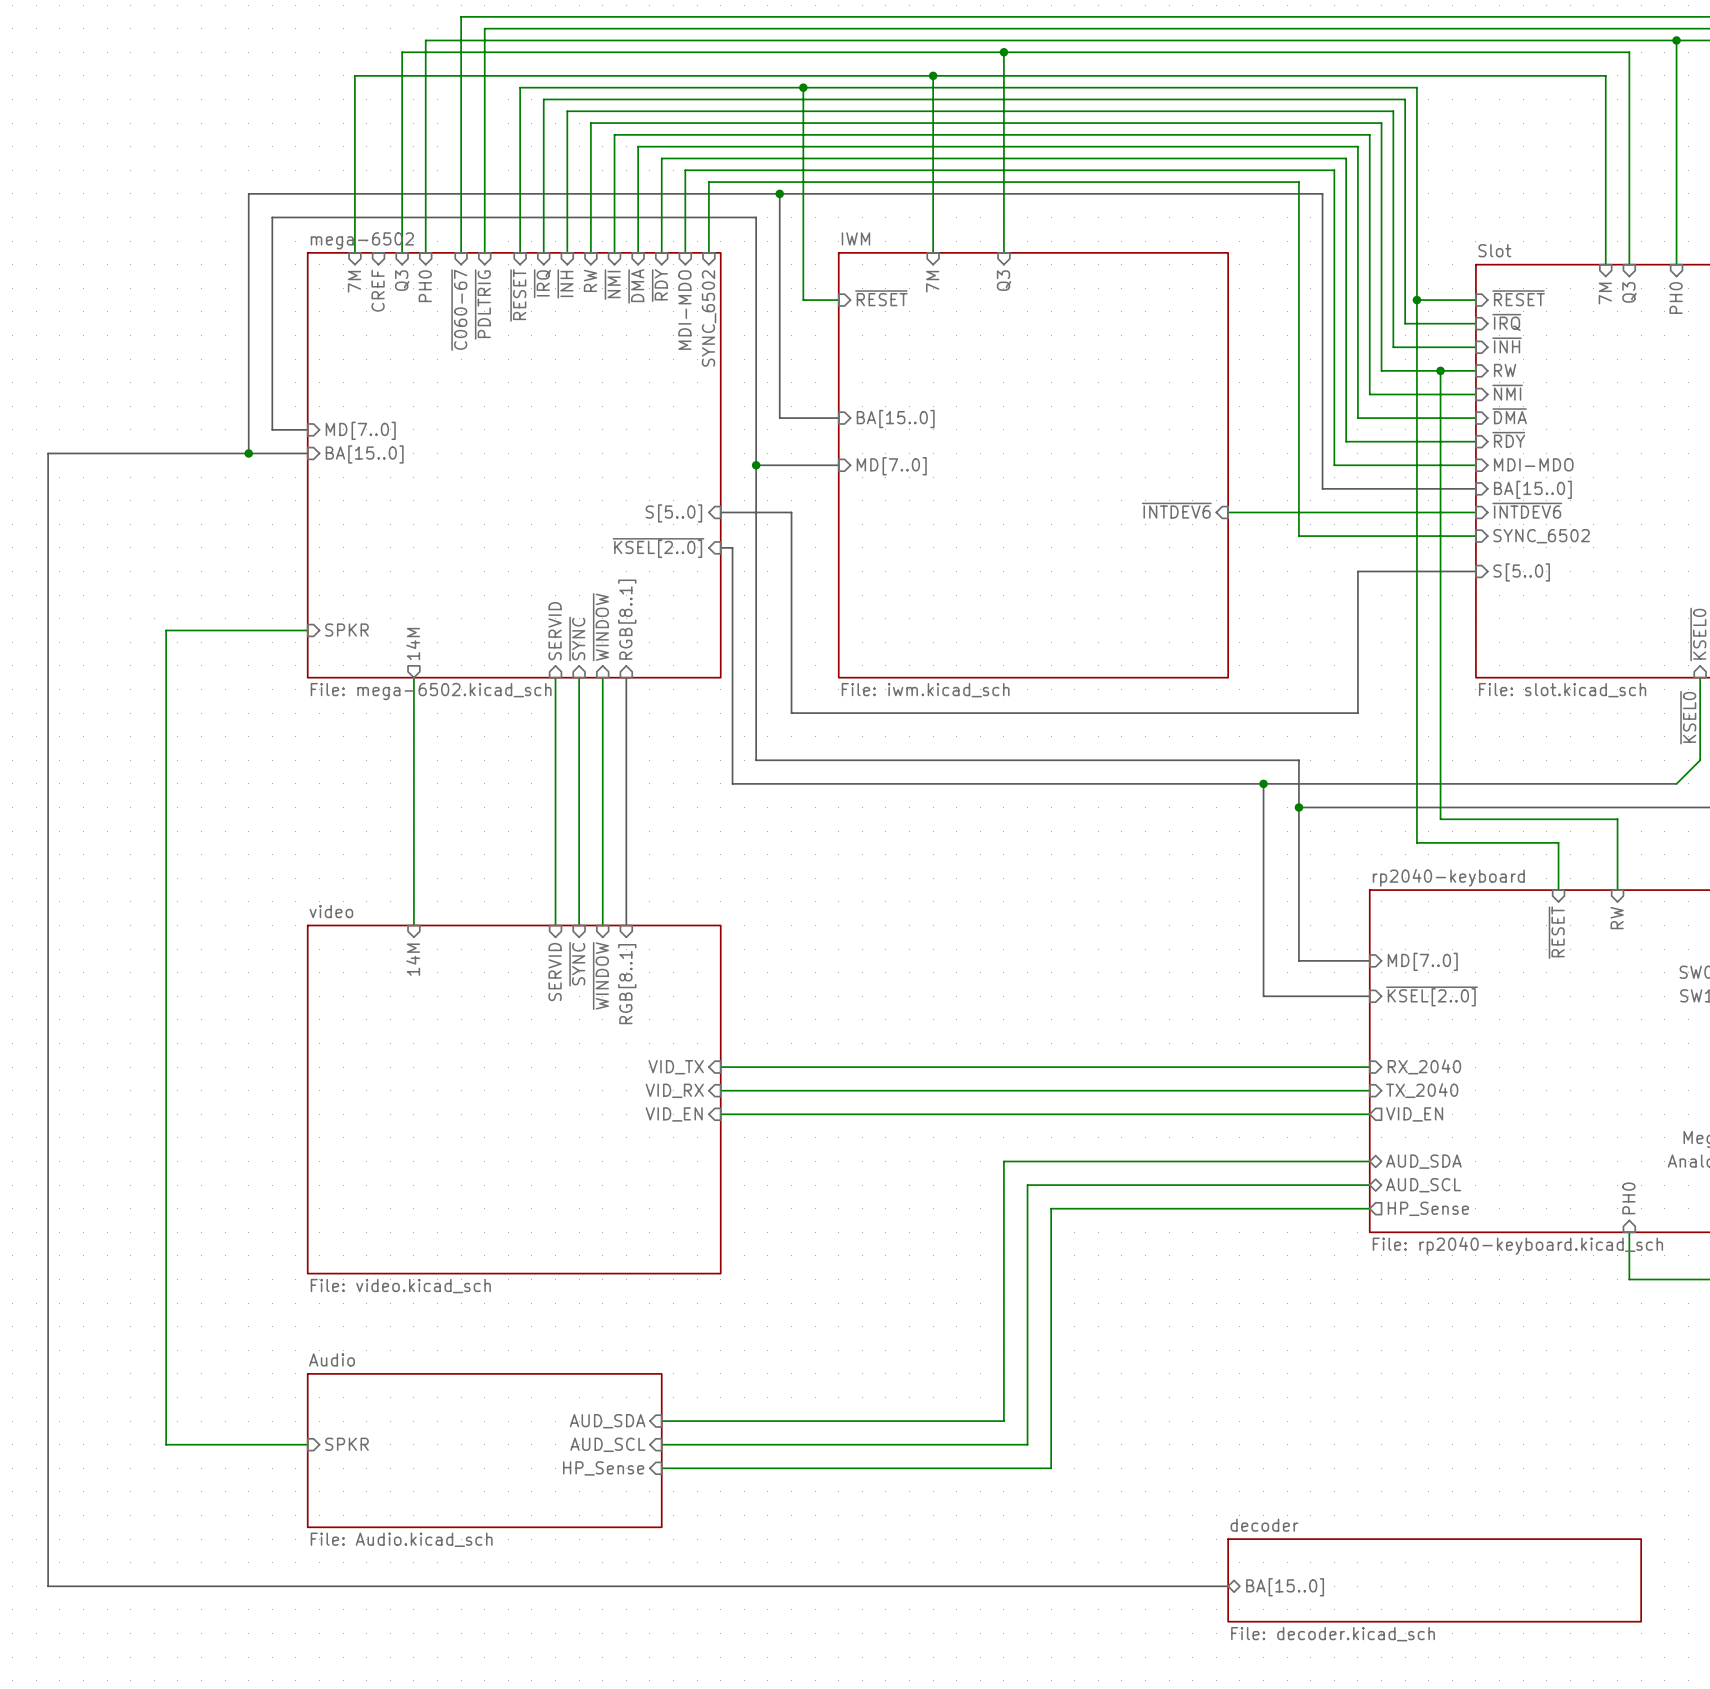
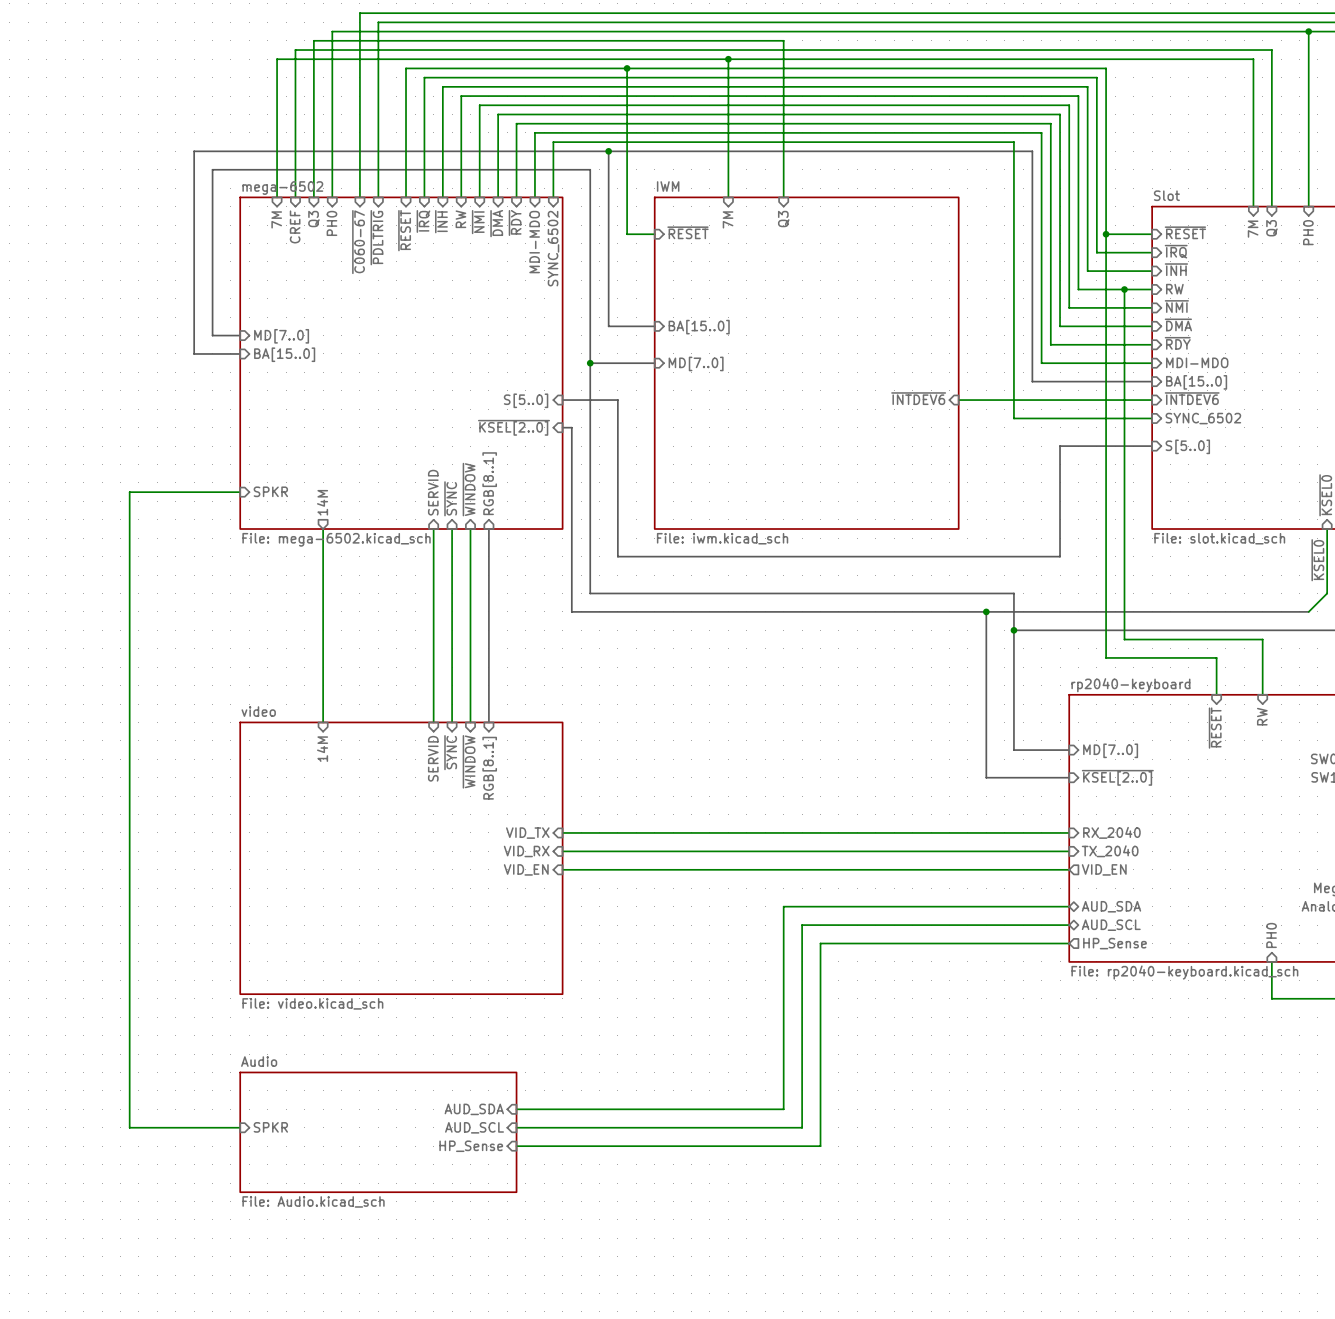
wire: (1003, 52) (1629, 52) (1629, 64) -> (295, 197) (295, 50) (1271, 50)
junction: (1003, 52) -> none
bus: (248, 453) (48, 453) (48, 1586) (1228, 1586) -> none
junction: (248, 453) -> none
sheet decoder: File: decoder.kicad_sch (1434, 1580) -> none
sheet pin: BA[15..0] (1285, 1587) -> none

